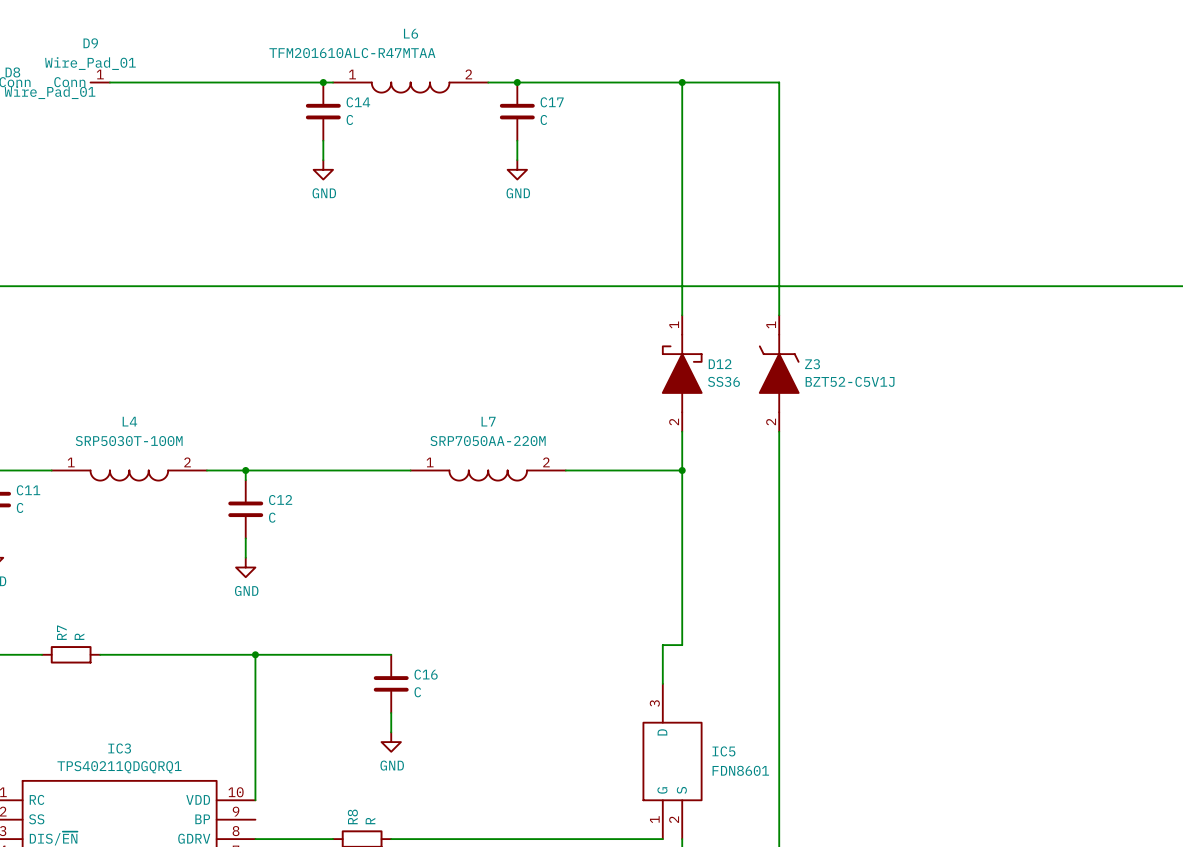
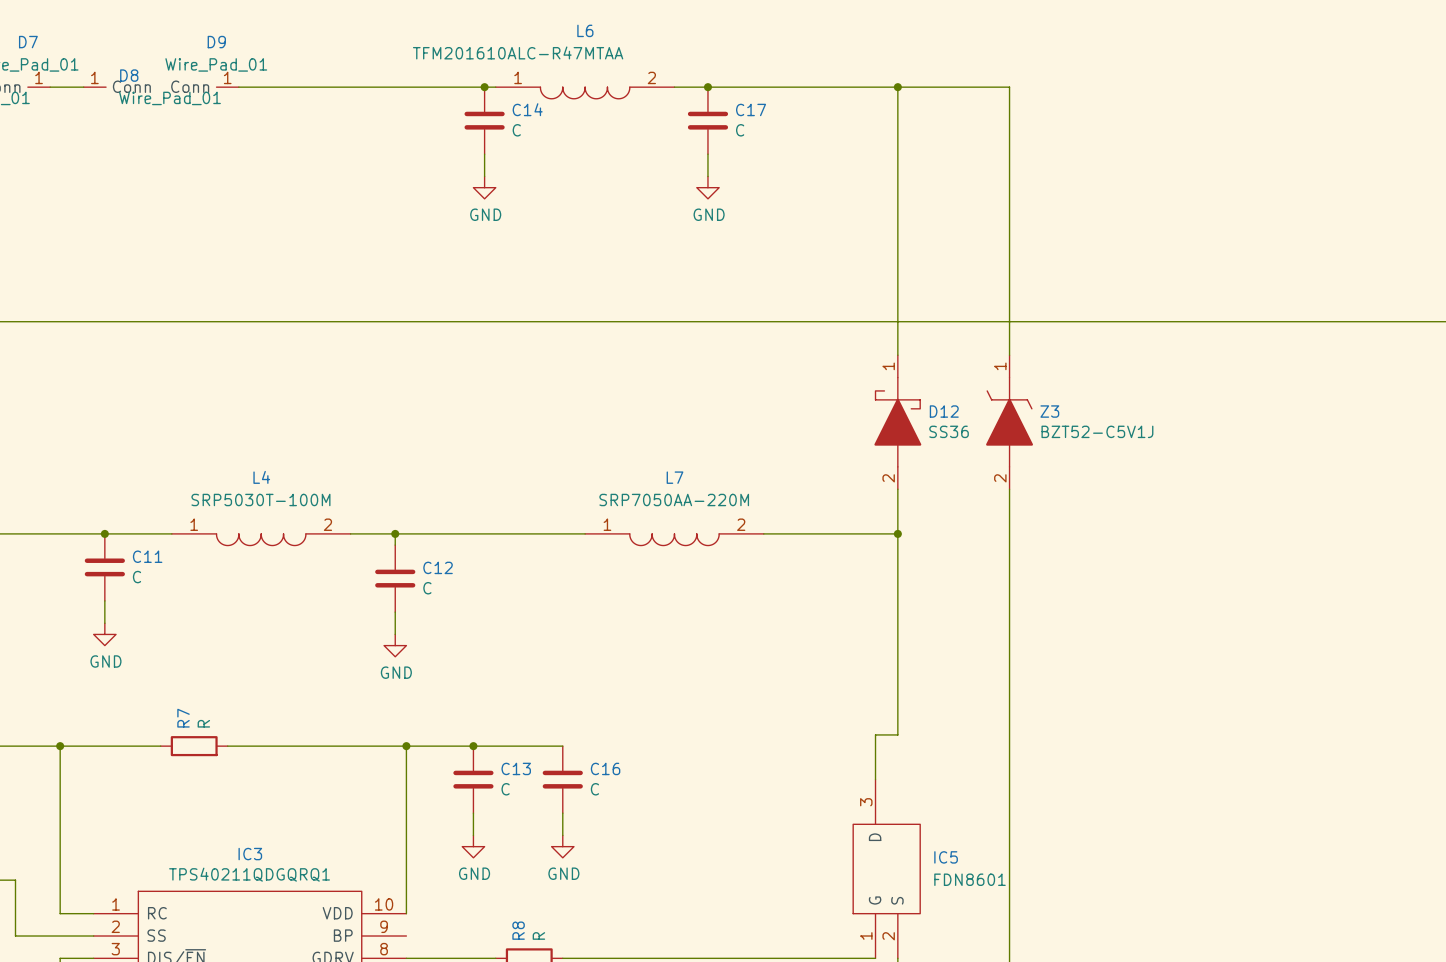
junction: none -> (473, 746)
C13: none -> C (473, 779)
wire: none -> (473, 813) (473, 835)
power symbol: none -> GND (473, 846)

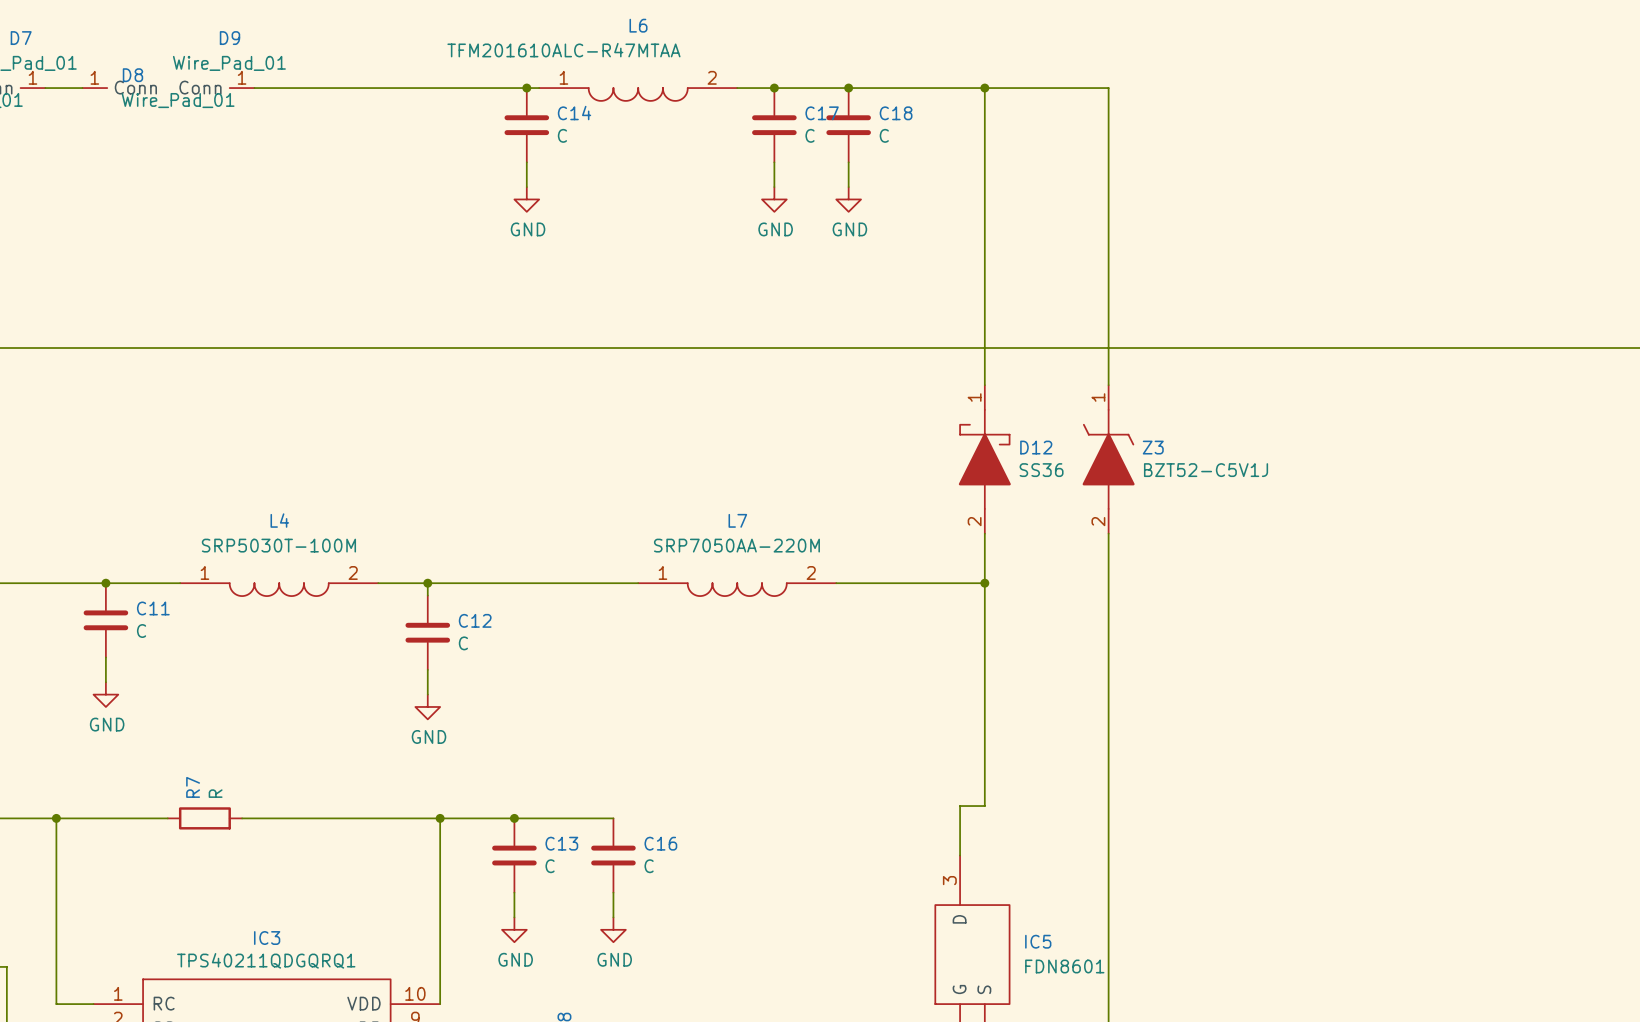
junction: none -> (848, 88)
C18: none -> C (848, 125)
wire: none -> (848, 162) (848, 187)
power symbol: none -> GND (848, 199)

